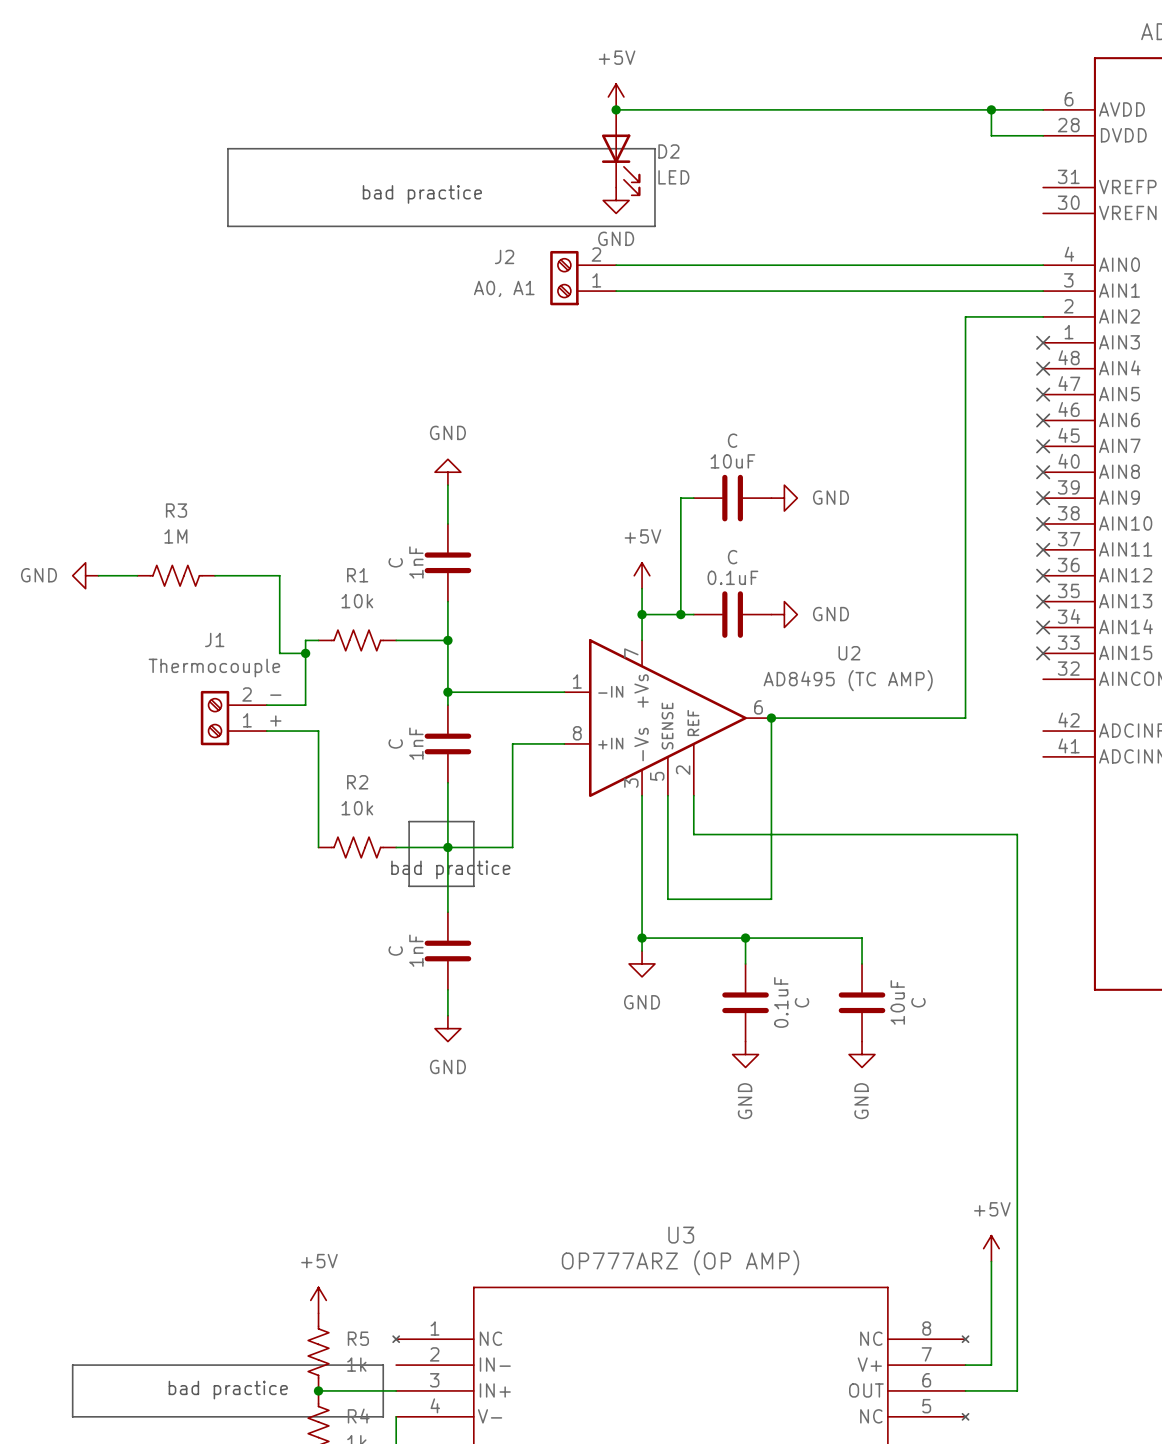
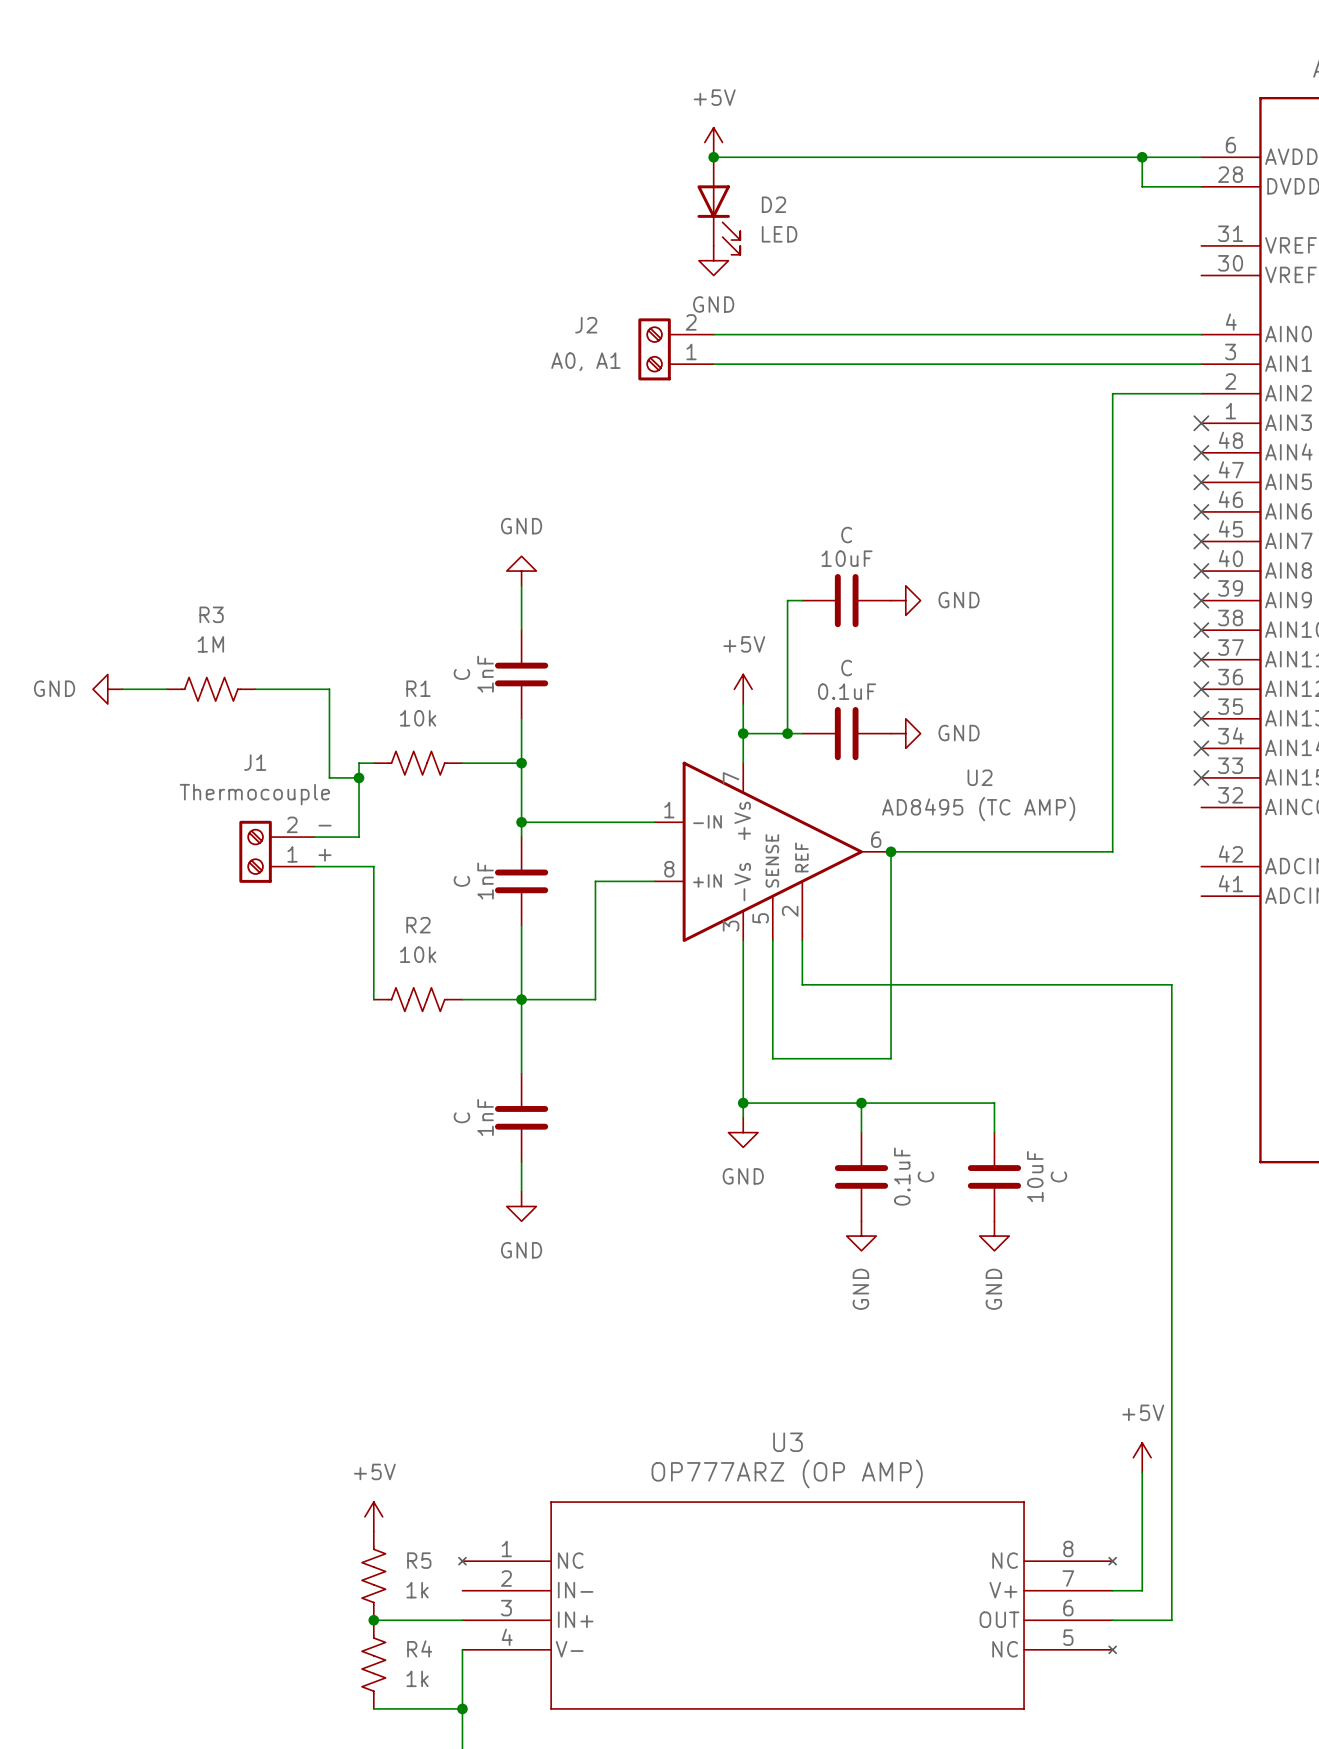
line: (227, 148) (654, 148) (654, 226) (227, 226) (227, 148) -> none
text: bad practice (422, 194) -> none
line: (409, 821) (473, 821) (473, 886) (409, 886) (409, 821) -> none
text: bad practice (450, 869) -> none
line: (72, 1365) (383, 1365) (383, 1416) (72, 1416) (72, 1365) -> none
text: bad practice (228, 1390) -> none

